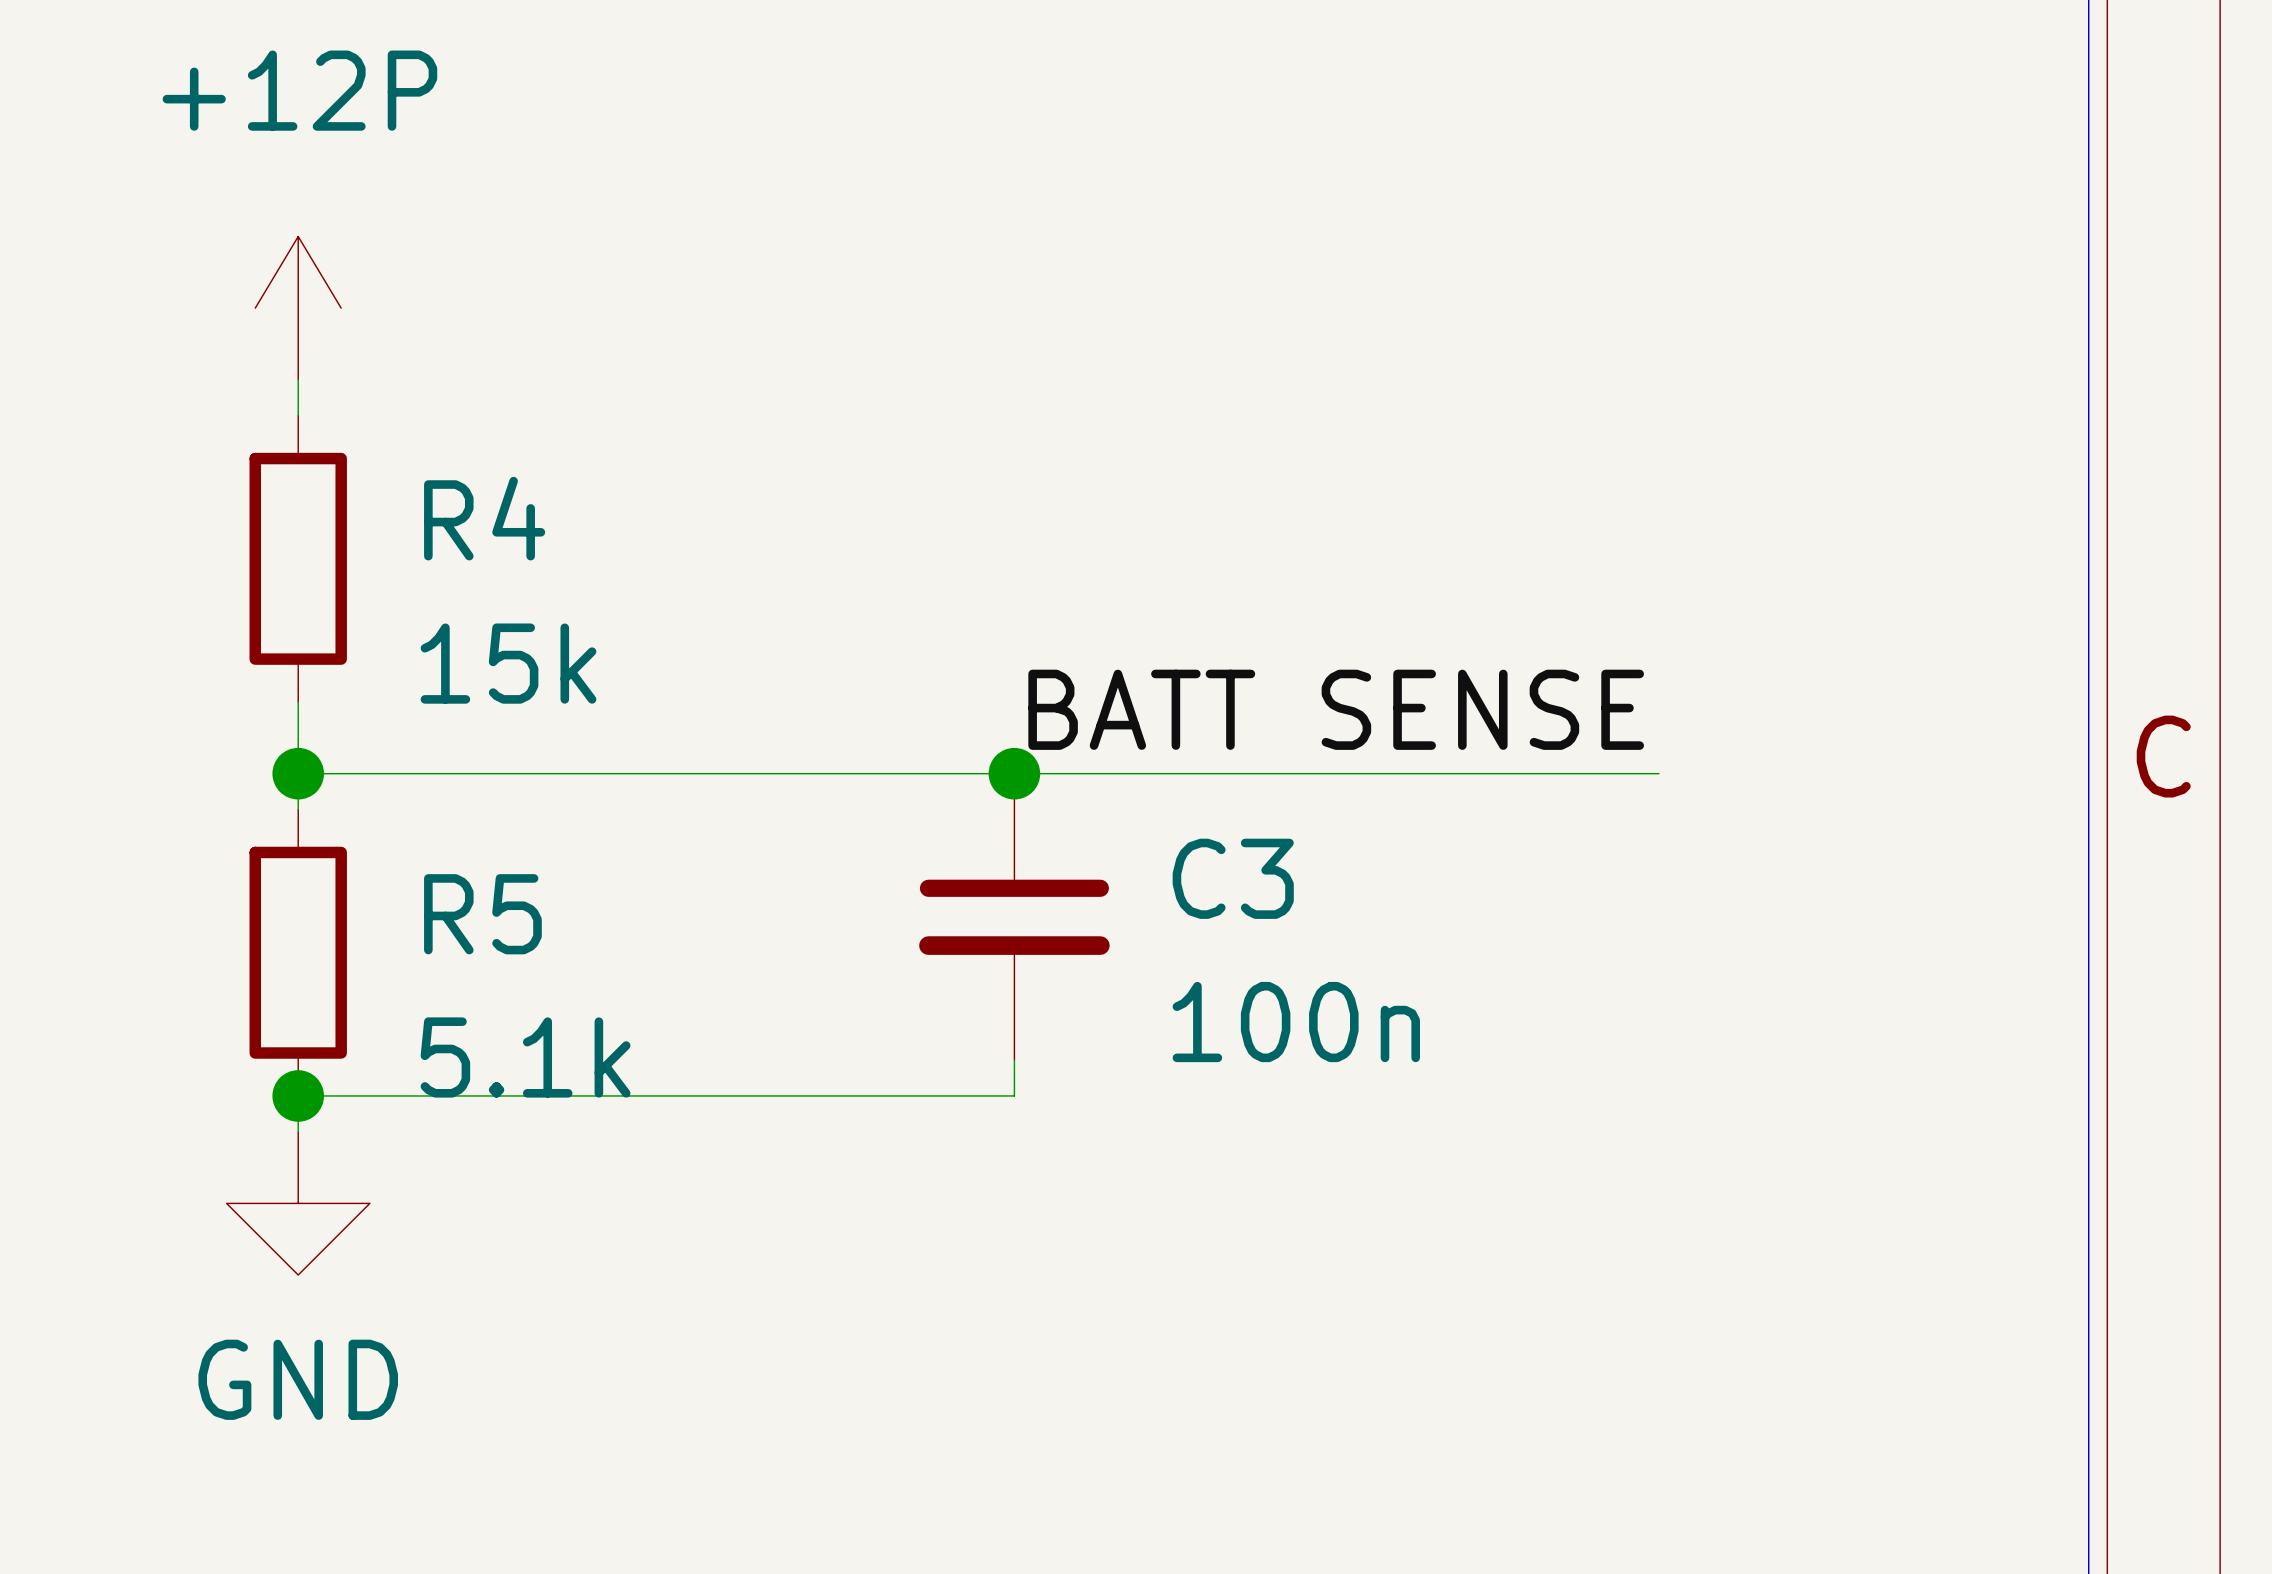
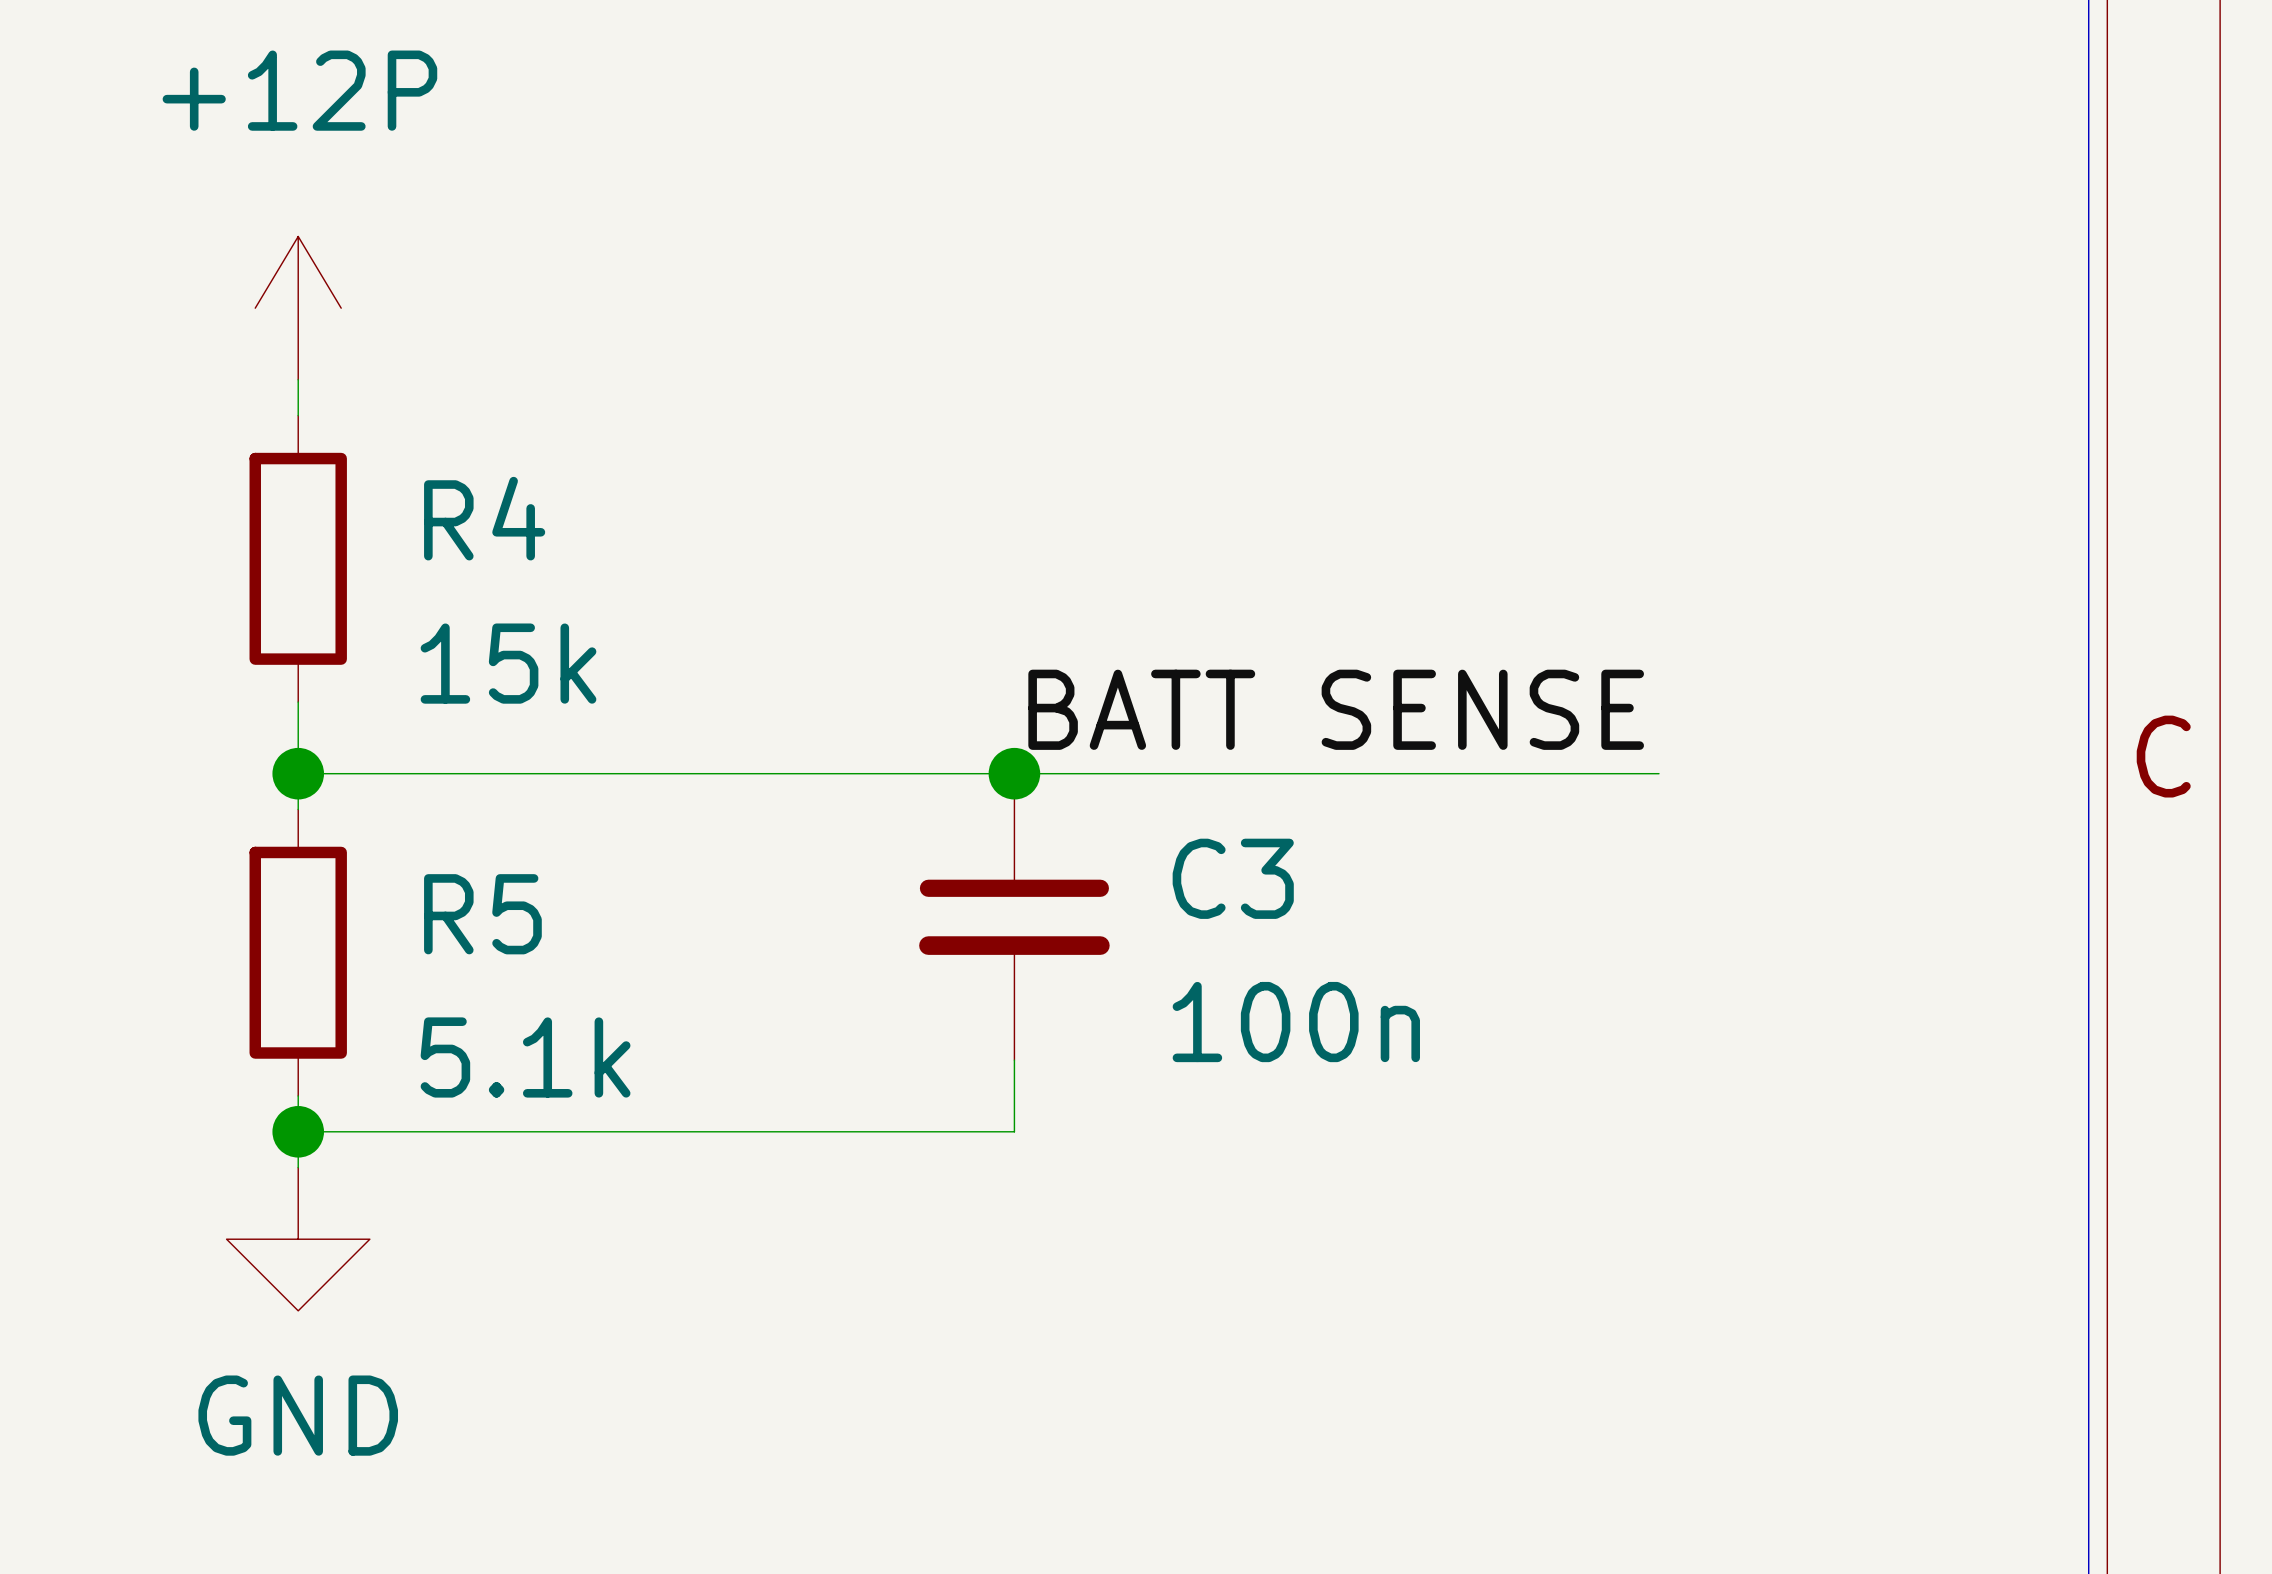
wire: (298, 1095) (1014, 1095) -> (298, 1167) (298, 1131) (1014, 1131) (1014, 1095)
junction position: (298, 1095) -> (298, 1131)
power symbol position: GND (298, 1203) -> GND (298, 1239)

